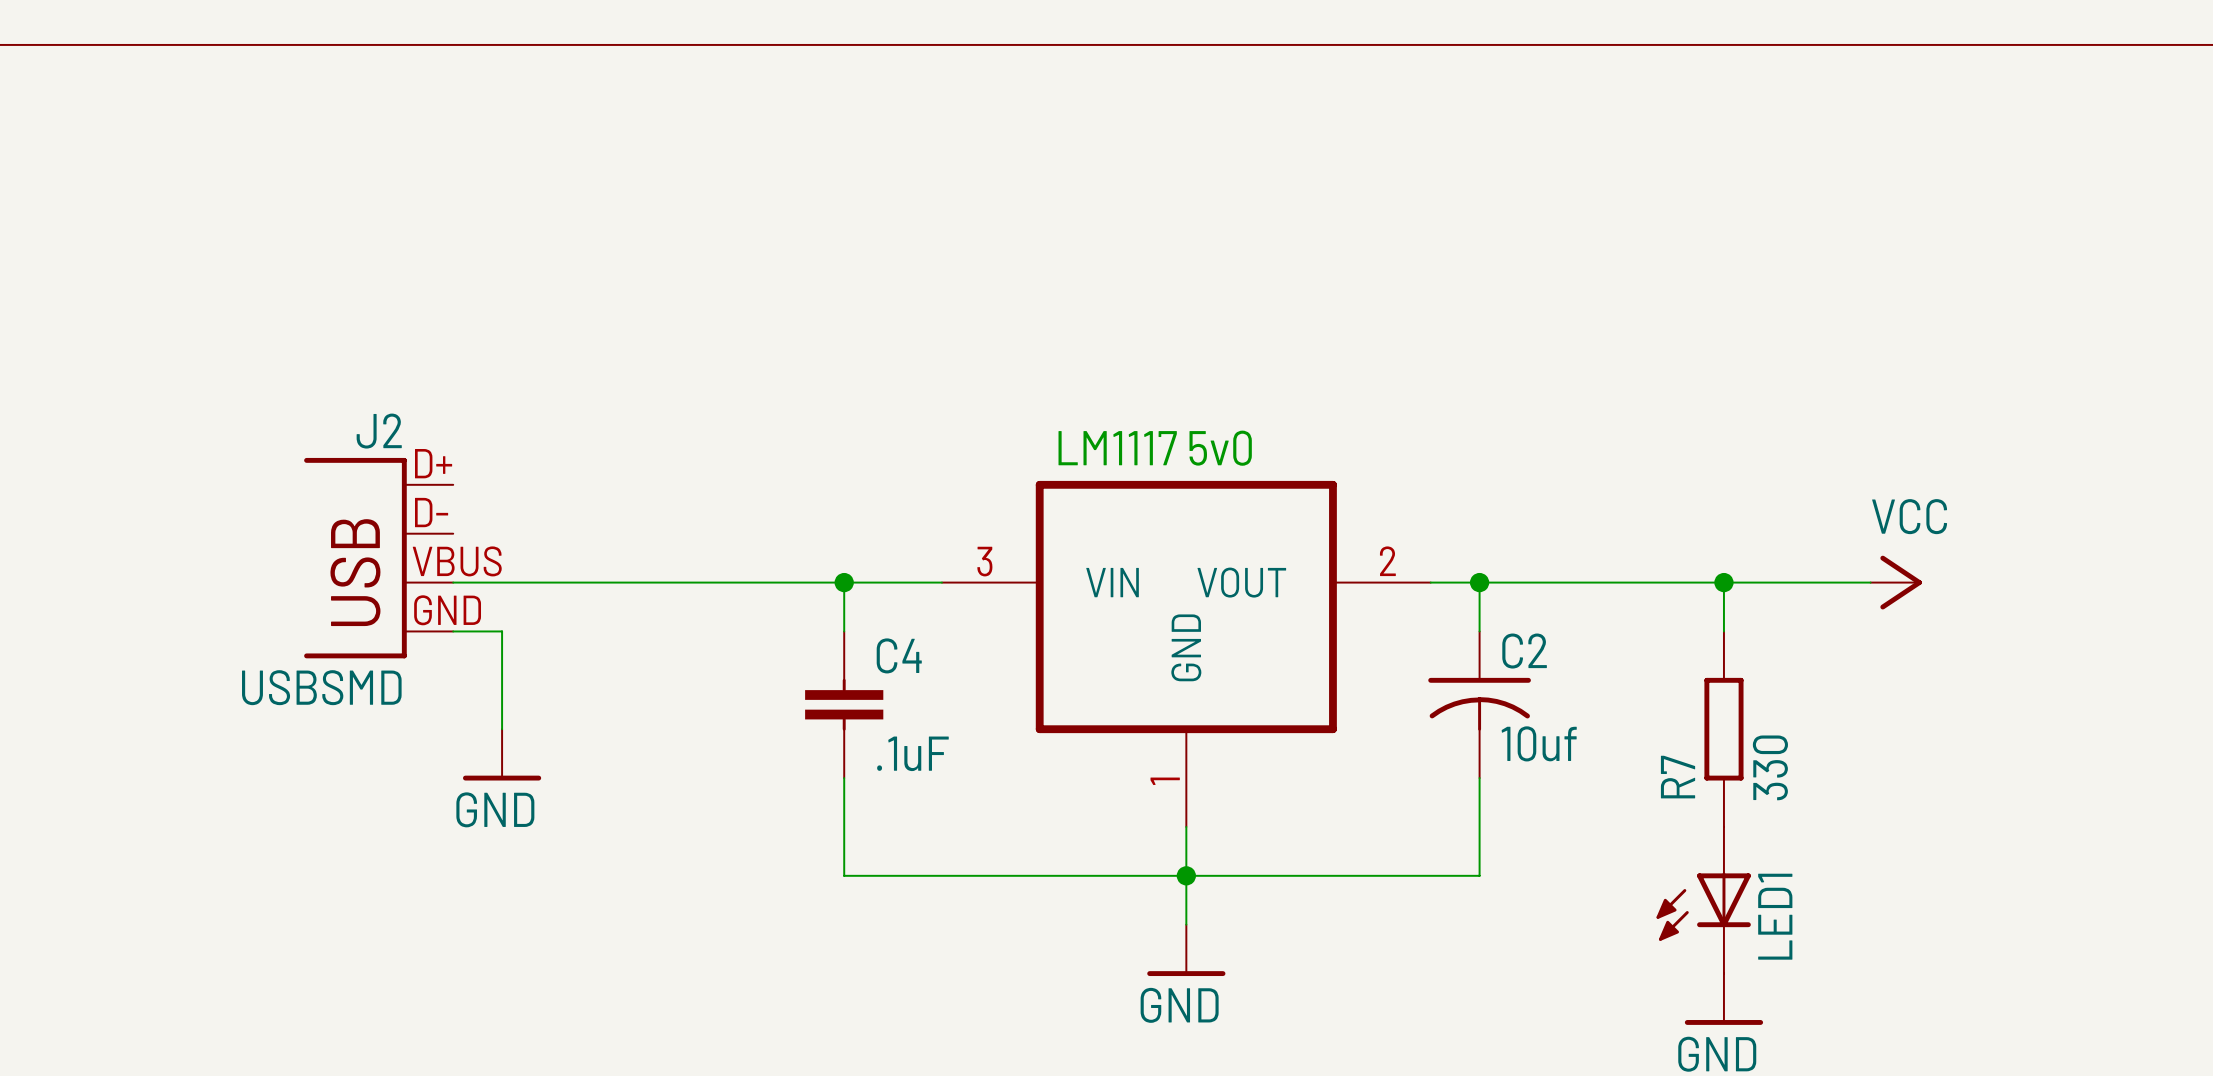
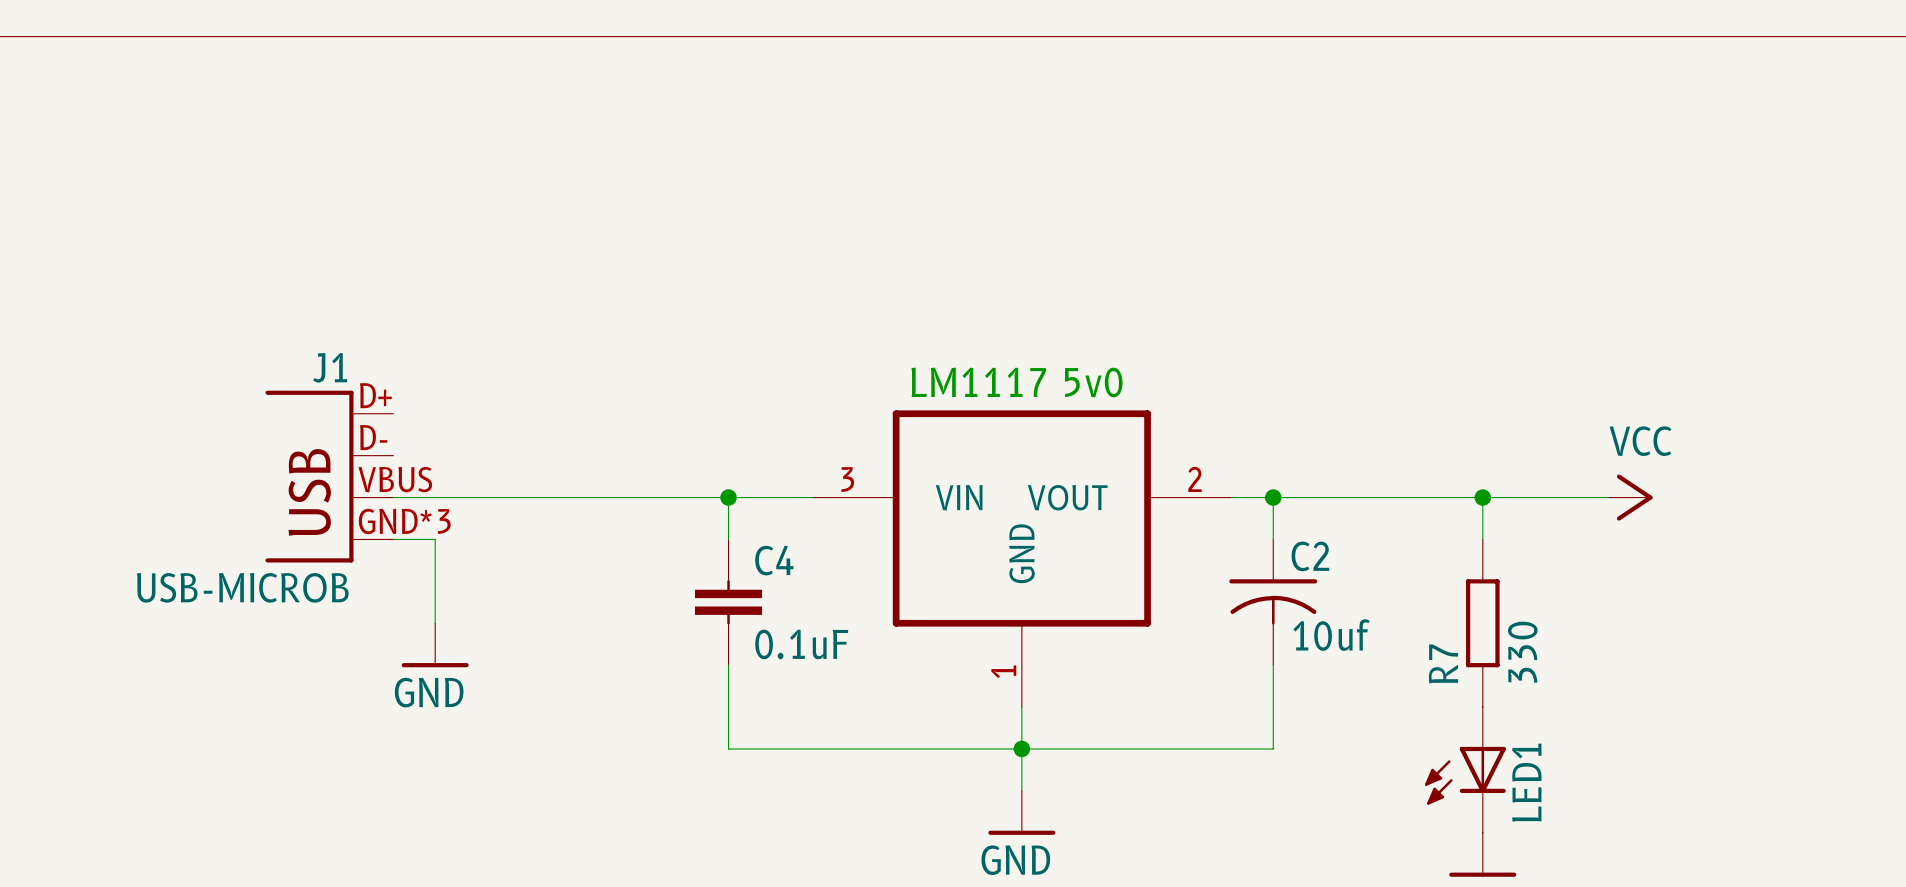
J2 name: J2 (379, 431) -> J1 (330, 367)
J2 pin number: GND (447, 610) -> GND*3 (404, 521)
J2 value: USBSMD (321, 687) -> USB-MICROB (242, 587)
C4 value: .1uF (912, 753) -> 0.1uF (801, 644)

